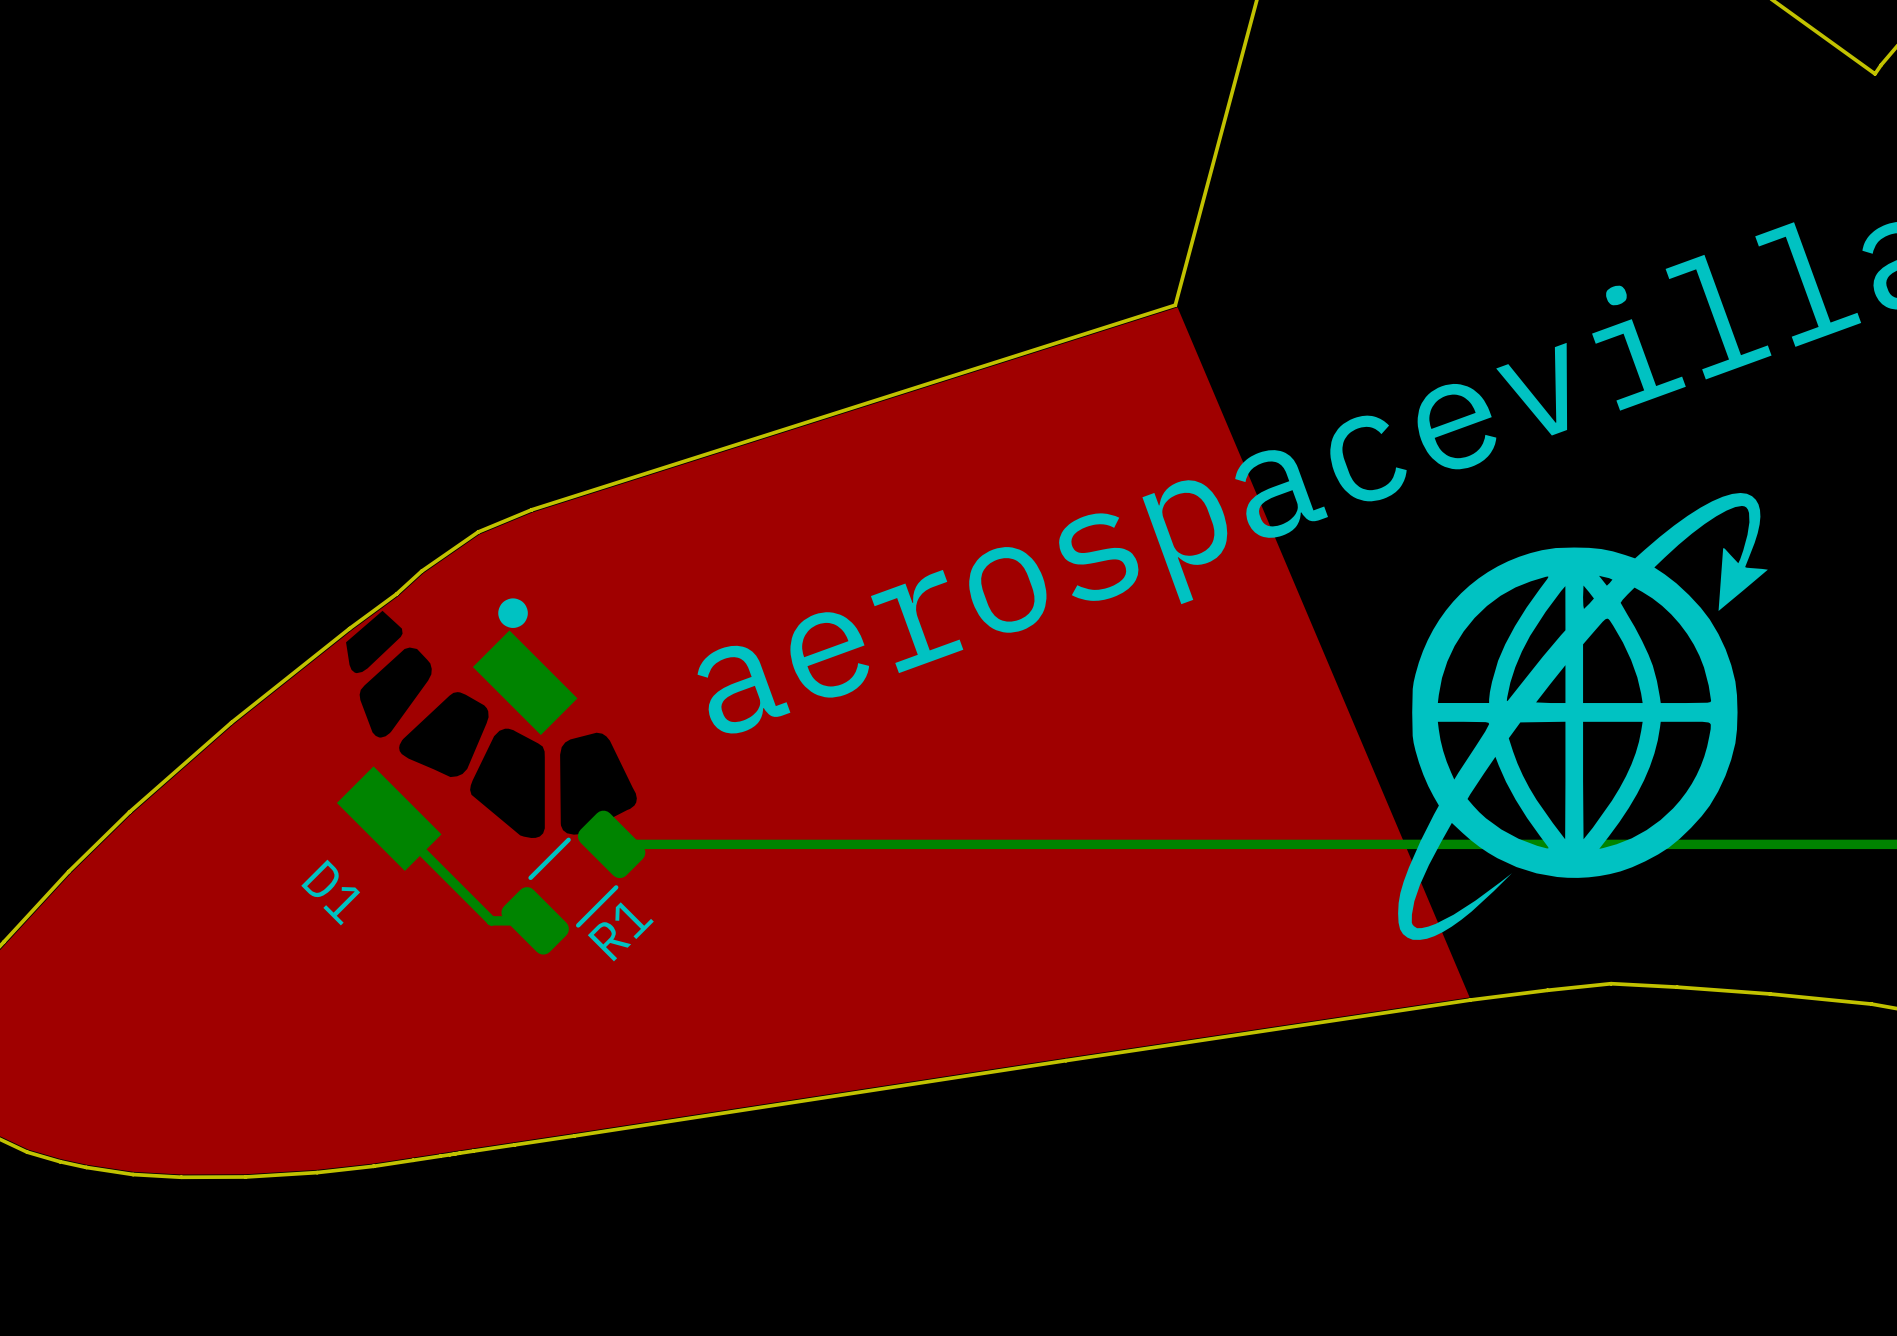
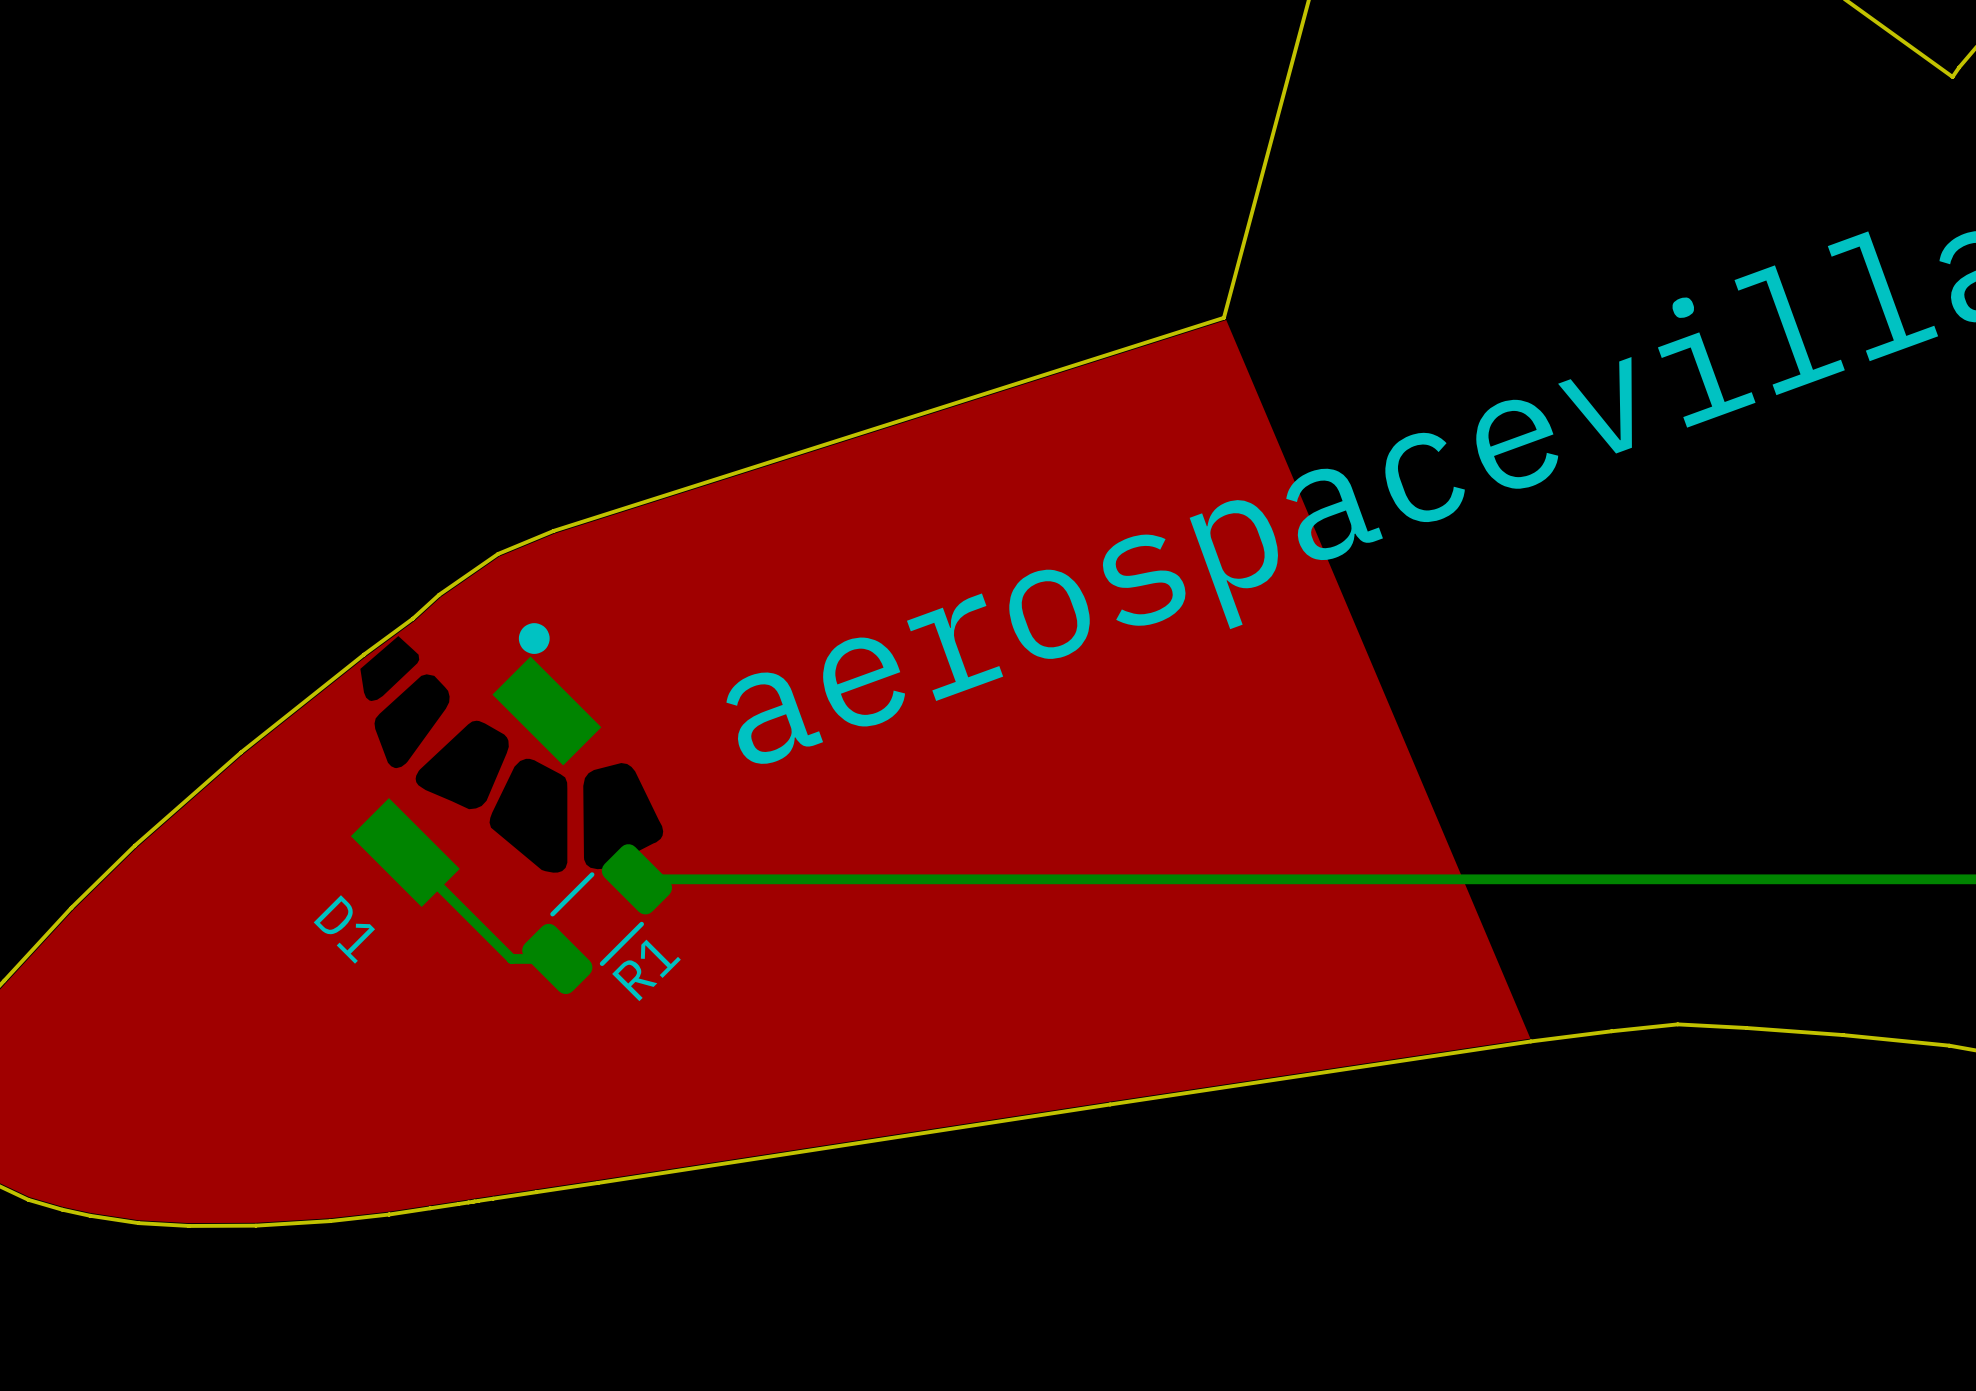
drawing: [1398, 492, 1768, 940] -> none

